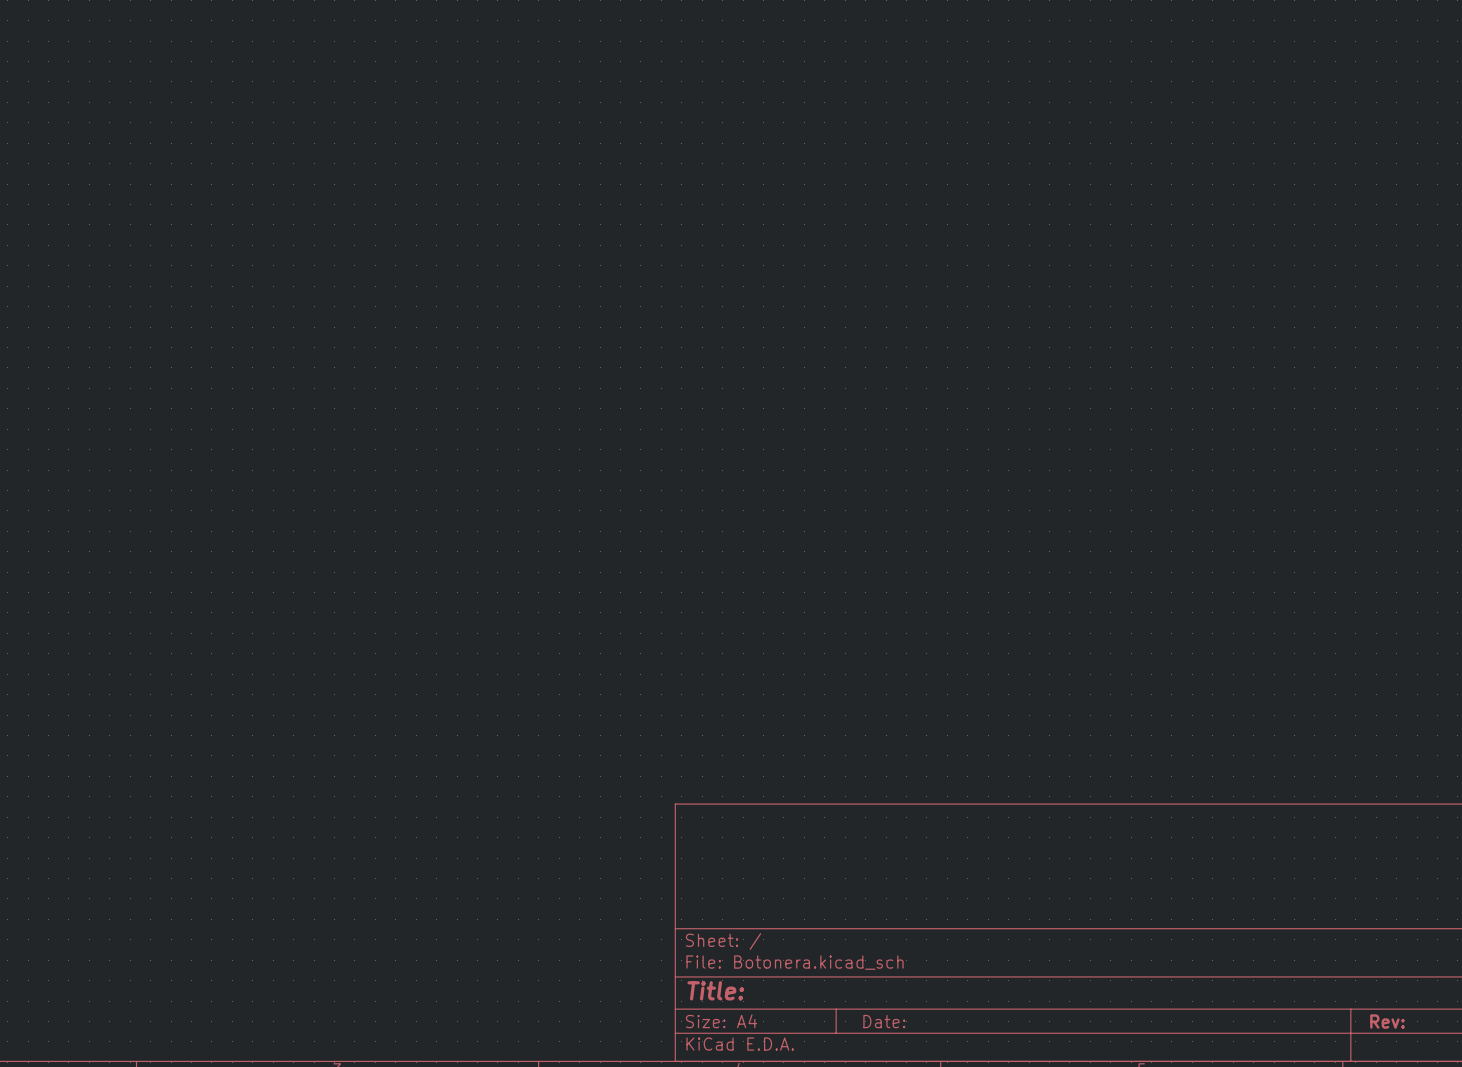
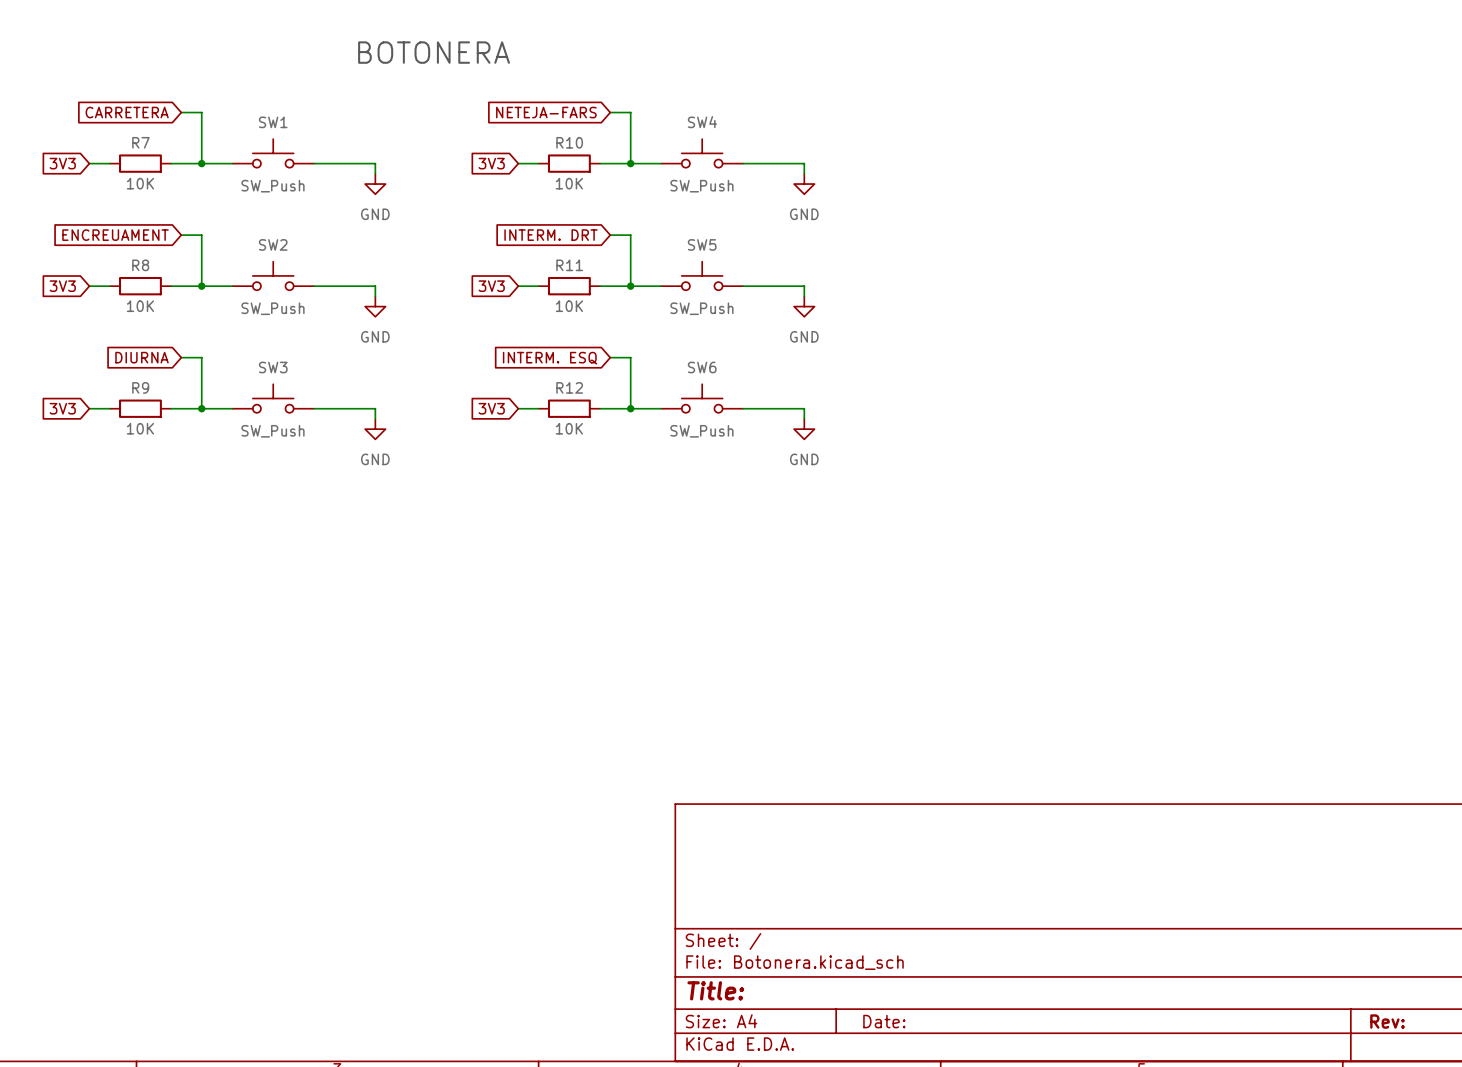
text: none -> BOTONERA (434, 52)
global label: none -> CARRETERA (127, 112)
wire: none -> (181, 112) (201, 112) (201, 163)
global label: none -> NETEJA-FARS (546, 112)
wire: none -> (610, 112) (630, 112) (630, 163)
SW1: none -> SW_Push (273, 153)
SW4: none -> SW_Push (702, 153)
global label: none -> 3V3 (62, 163)
wire: none -> (89, 163) (109, 163)
R7: none -> 10K (140, 163)
wire: none -> (171, 163) (232, 163)
junction: none -> (201, 163)
wire: none -> (314, 163) (375, 163) (375, 173)
global label: none -> 3V3 (491, 163)
wire: none -> (518, 163) (538, 163)
R10: none -> 10K (569, 163)
wire: none -> (600, 163) (661, 163)
junction: none -> (630, 163)
wire: none -> (743, 163) (804, 163) (804, 173)
power symbol: none -> GND (375, 184)
power symbol: none -> GND (804, 184)
global label: none -> ENCREUAMENT (115, 235)
wire: none -> (181, 235) (201, 235) (201, 286)
global label: none -> INTERM. DRT (551, 235)
wire: none -> (610, 235) (630, 235) (630, 286)
SW2: none -> SW_Push (273, 275)
SW5: none -> SW_Push (702, 275)
global label: none -> 3V3 (62, 286)
wire: none -> (89, 286) (109, 286)
R8: none -> 10K (140, 286)
wire: none -> (171, 286) (232, 286)
junction: none -> (201, 286)
wire: none -> (314, 286) (375, 286) (375, 296)
global label: none -> 3V3 (491, 286)
wire: none -> (518, 286) (538, 286)
R11: none -> 10K (569, 286)
wire: none -> (600, 286) (661, 286)
junction: none -> (630, 286)
wire: none -> (743, 286) (804, 286) (804, 296)
power symbol: none -> GND (375, 306)
power symbol: none -> GND (804, 306)
global label: none -> DIURNA (142, 357)
wire: none -> (181, 357) (201, 357) (201, 408)
wire: none -> (610, 357) (630, 357) (630, 408)
global label: none -> INTERM. ESQ (550, 358)
SW3: none -> SW_Push (273, 398)
SW6: none -> SW_Push (702, 398)
global label: none -> 3V3 (62, 408)
wire: none -> (89, 408) (109, 408)
R9: none -> 10K (140, 408)
wire: none -> (171, 408) (232, 408)
junction: none -> (201, 408)
wire: none -> (314, 408) (375, 408) (375, 418)
global label: none -> 3V3 (491, 408)
wire: none -> (518, 408) (538, 408)
R12: none -> 10K (569, 408)
wire: none -> (600, 408) (661, 408)
junction: none -> (630, 408)
wire: none -> (743, 408) (804, 408) (804, 418)
power symbol: none -> GND (375, 429)
power symbol: none -> GND (804, 429)

